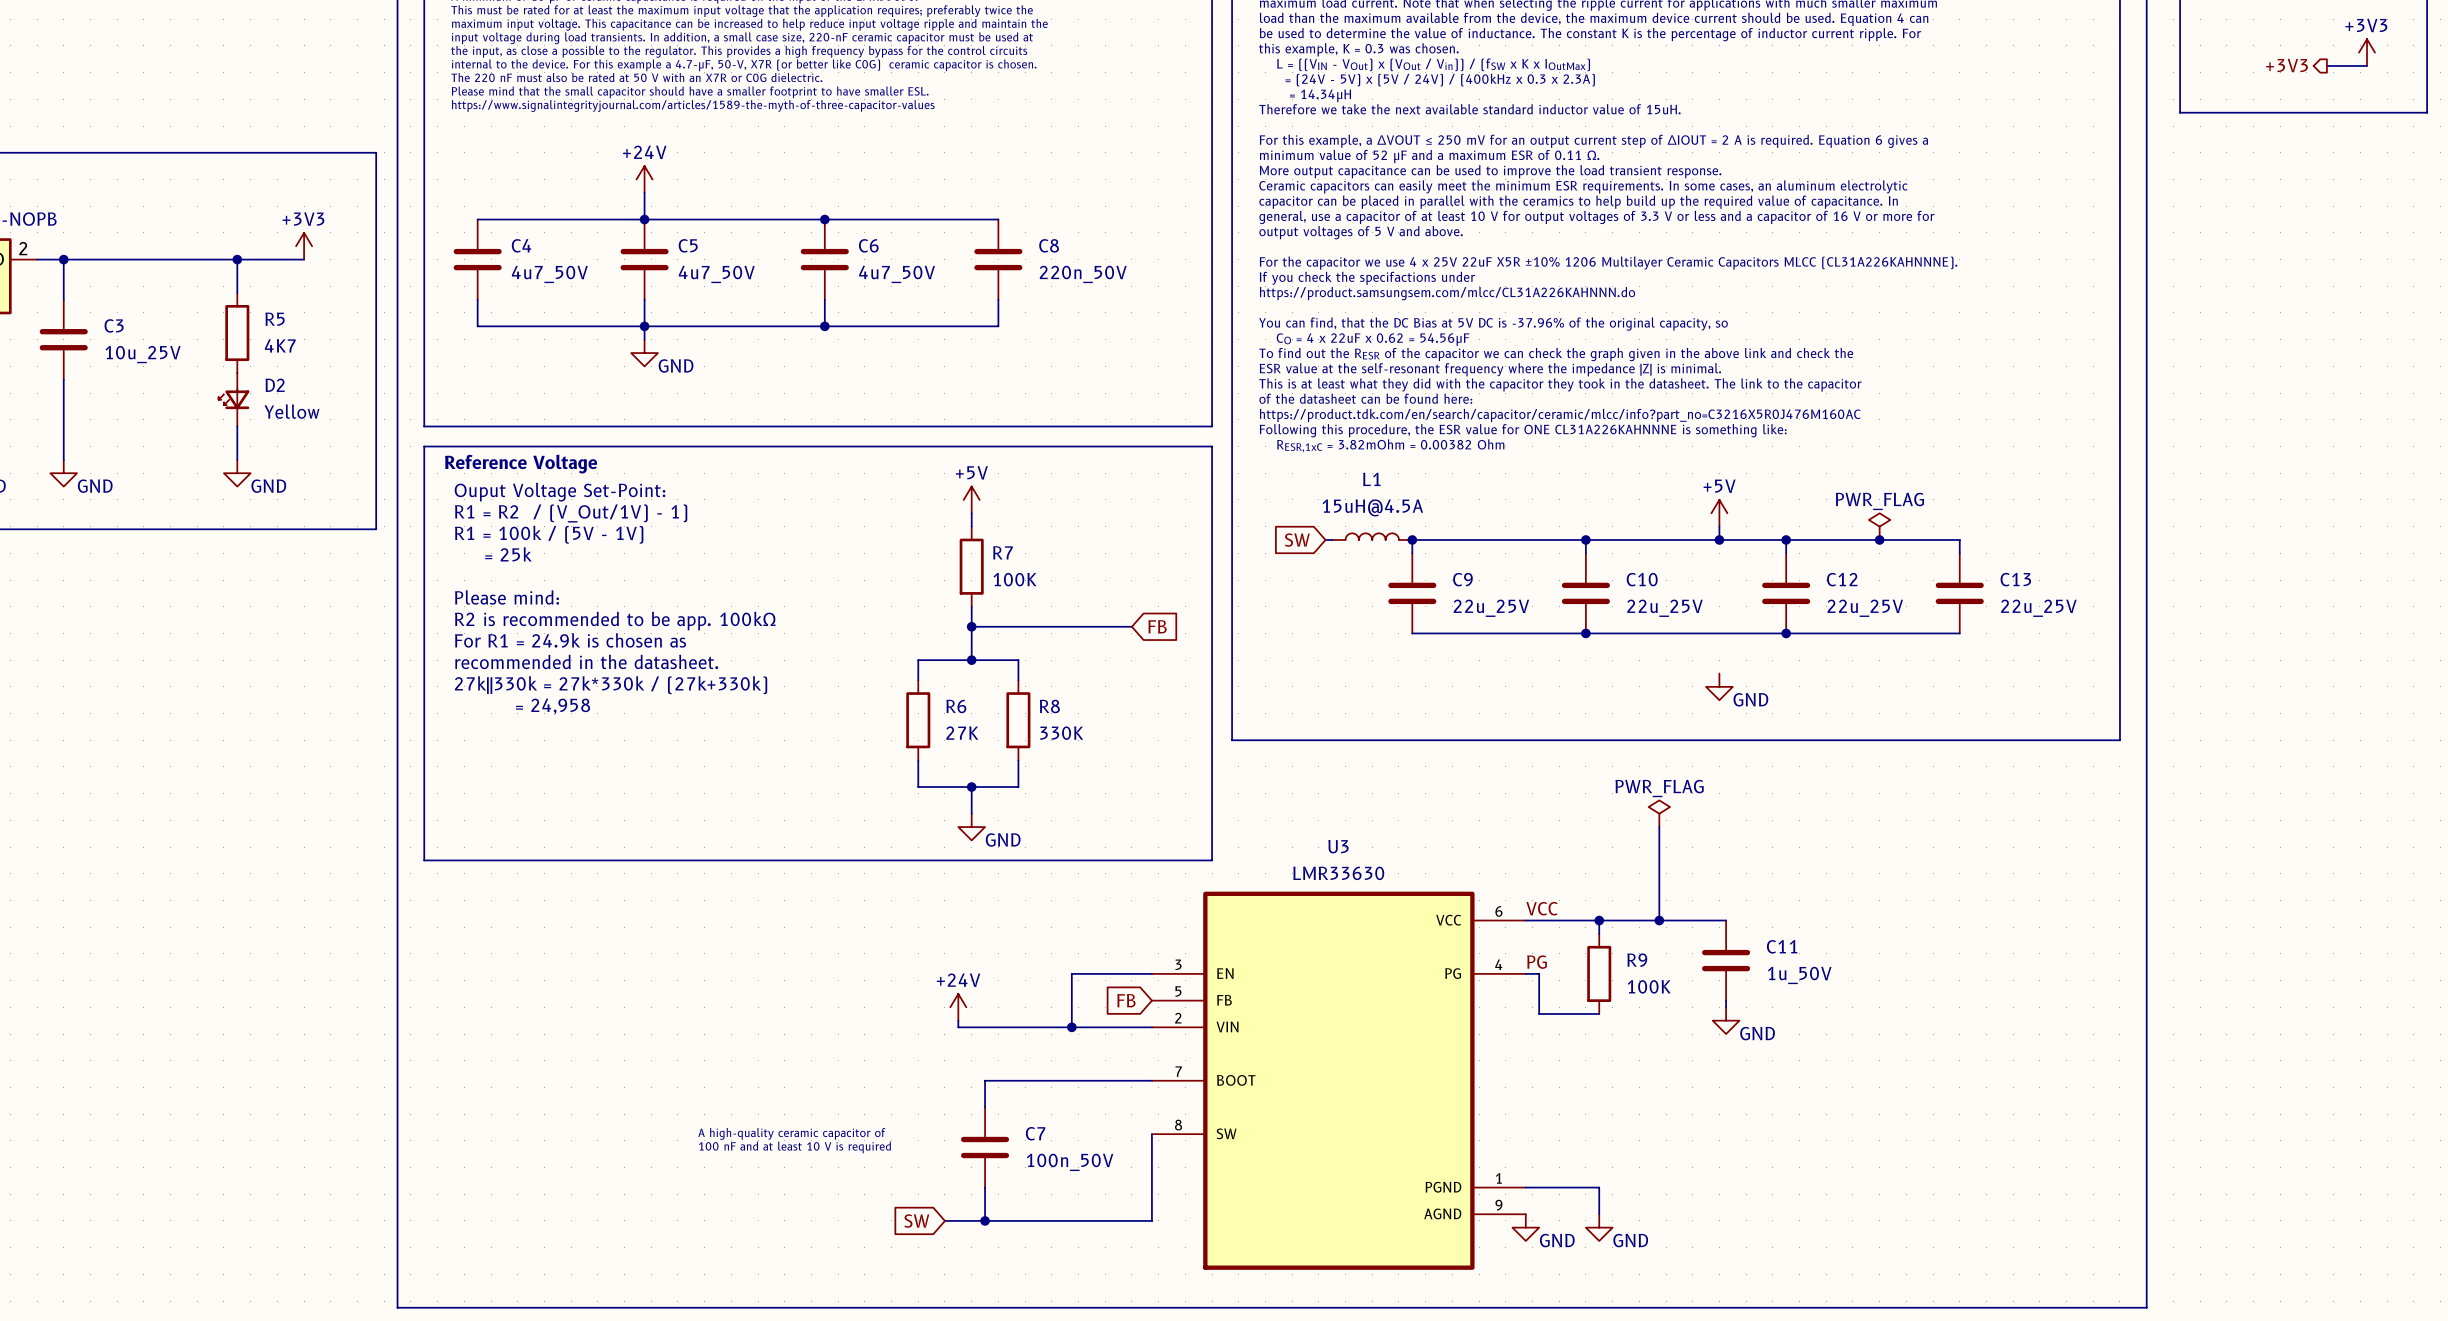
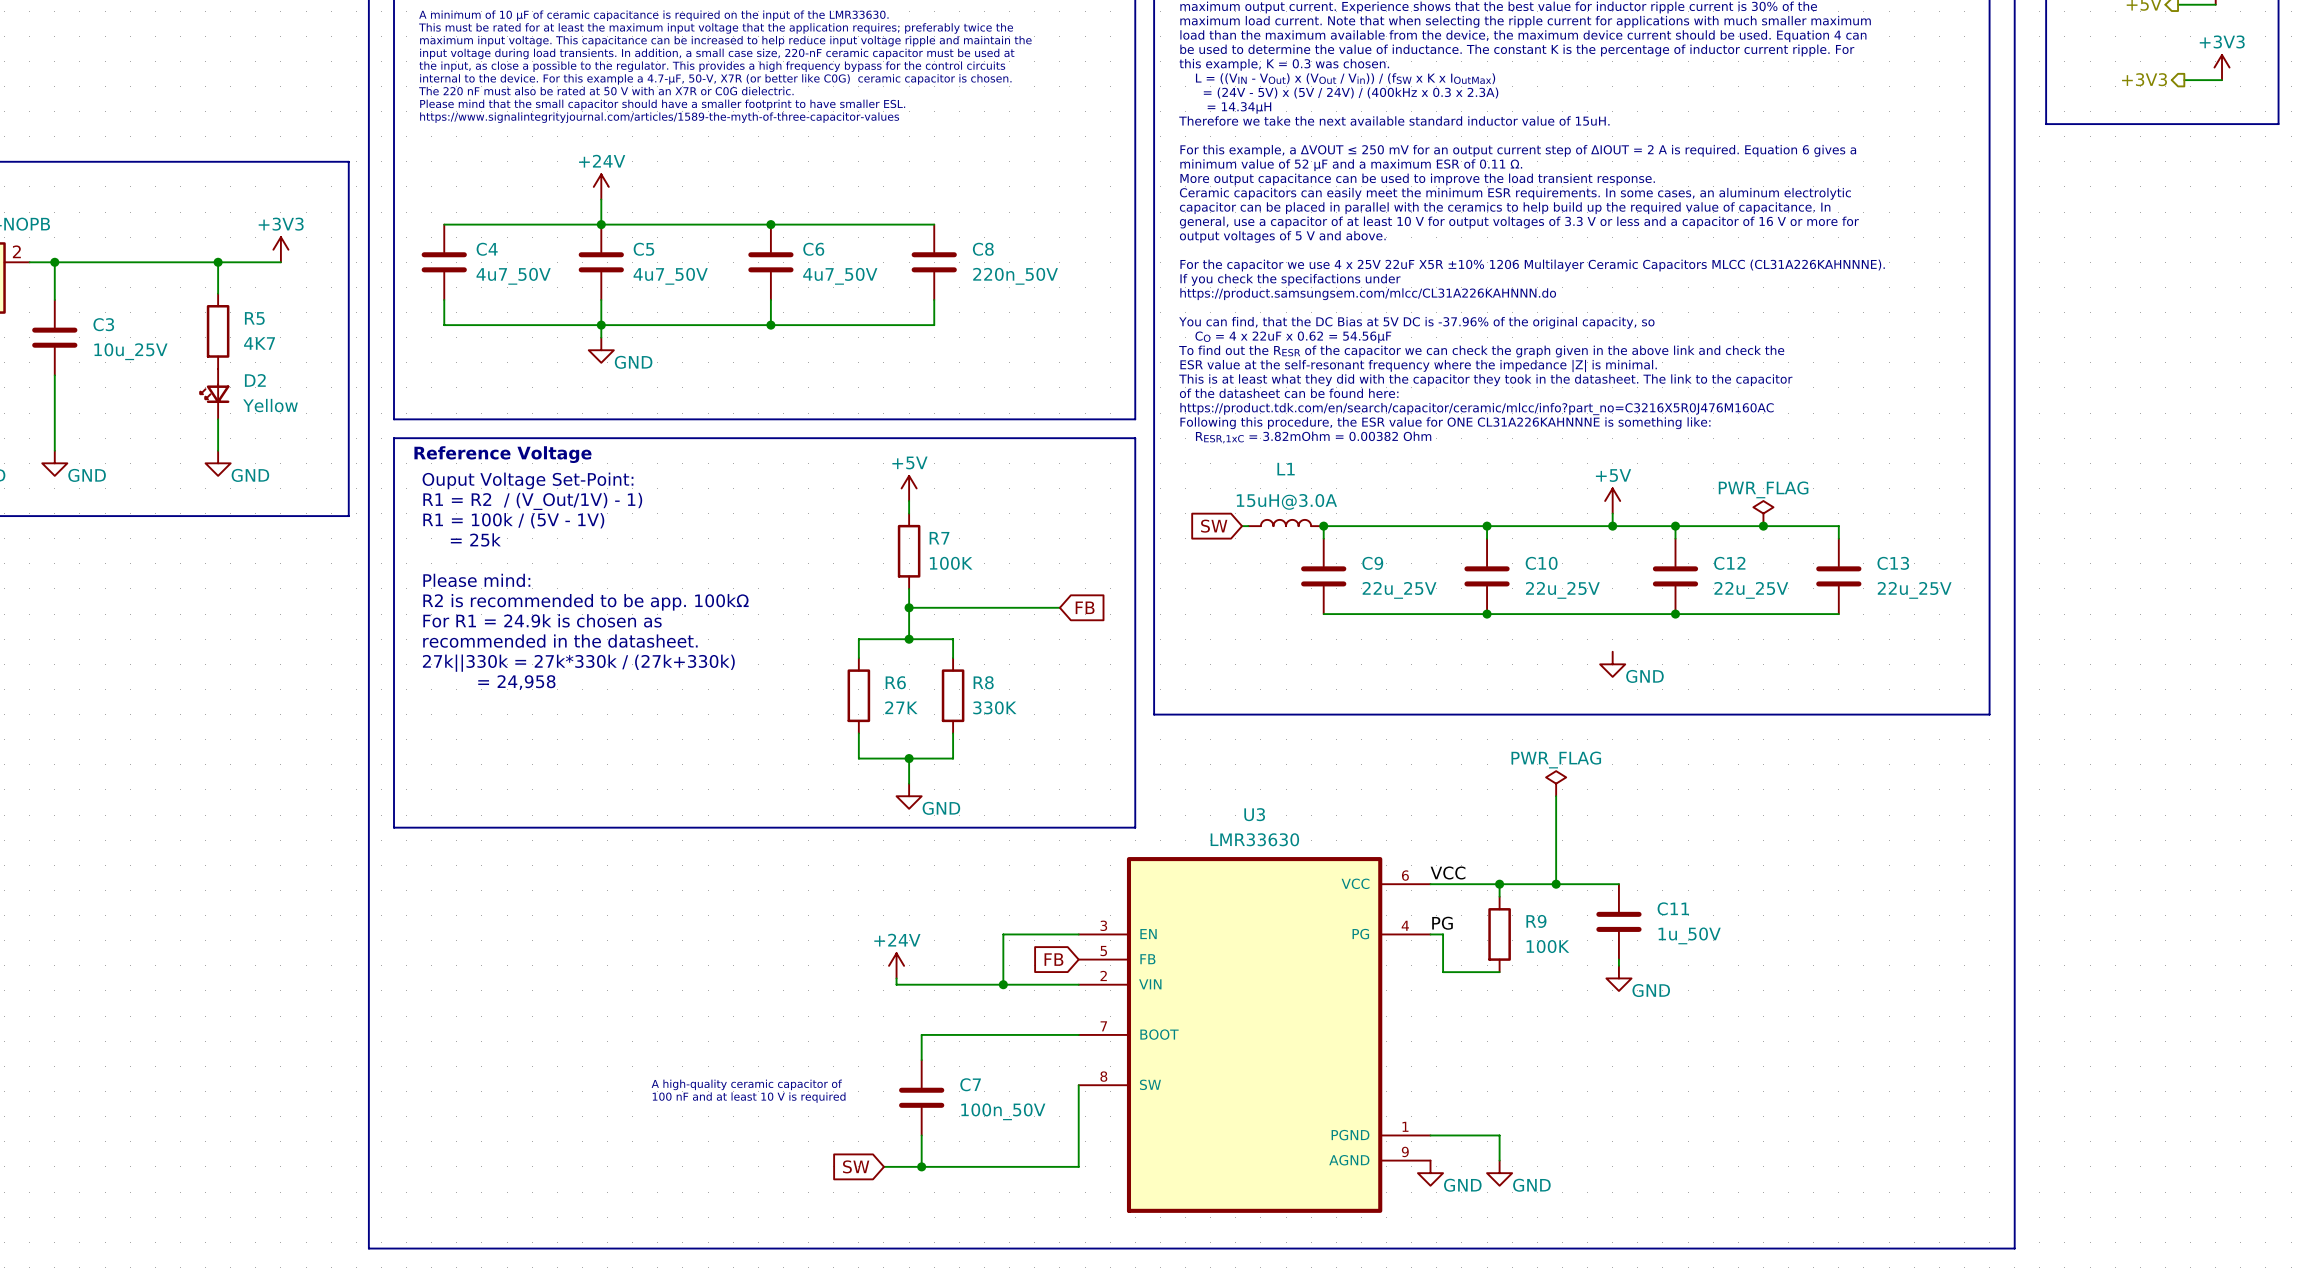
L1 value: 15uH@4.5A (1372, 507) -> 15uH@3.0A (1286, 501)

